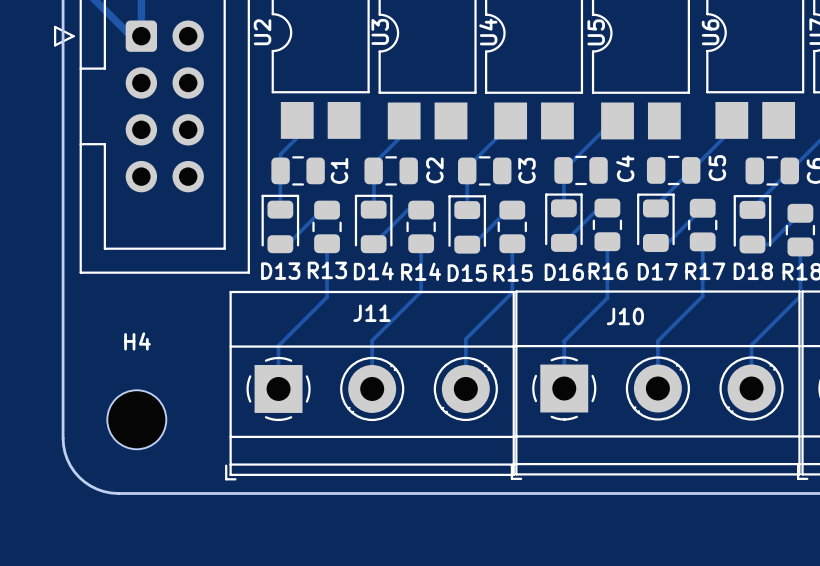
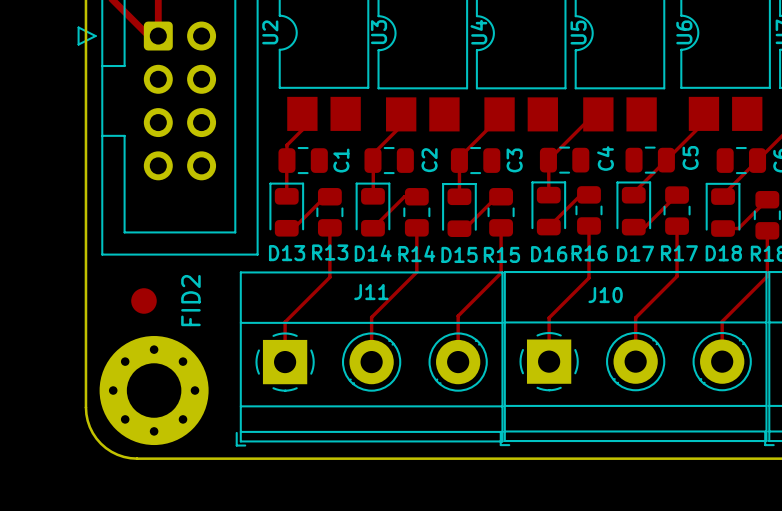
FID2: none -> (143, 300)
H4: (136, 419) -> none
part: none -> (154, 390)

